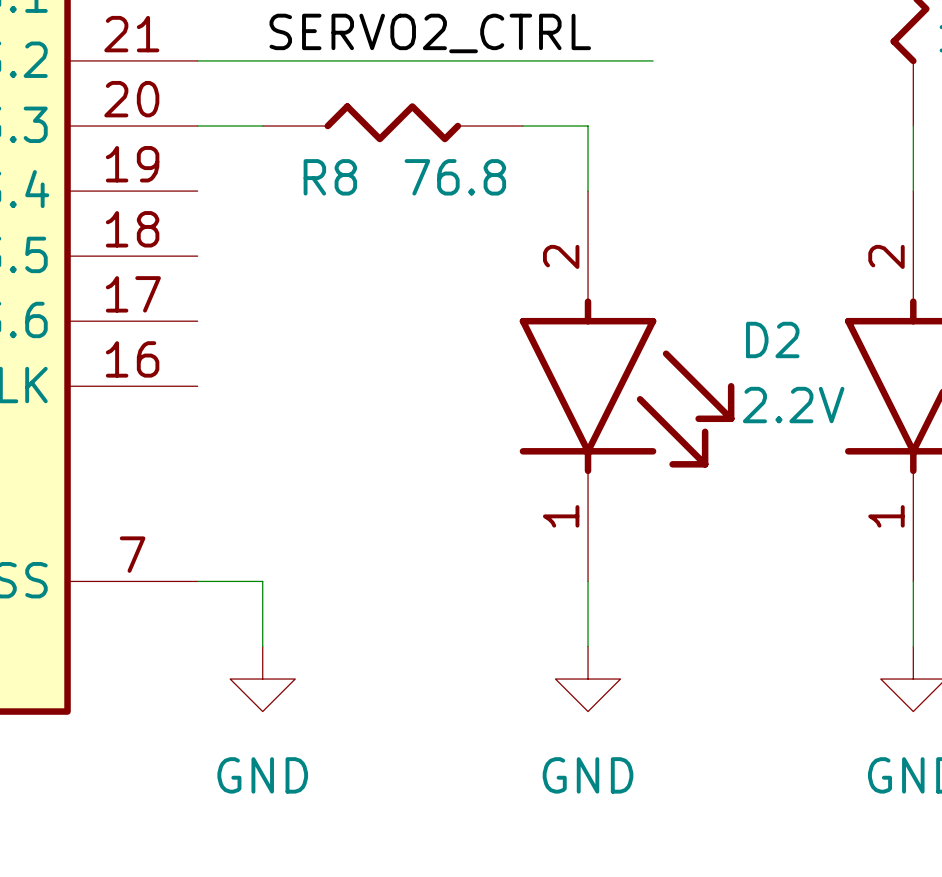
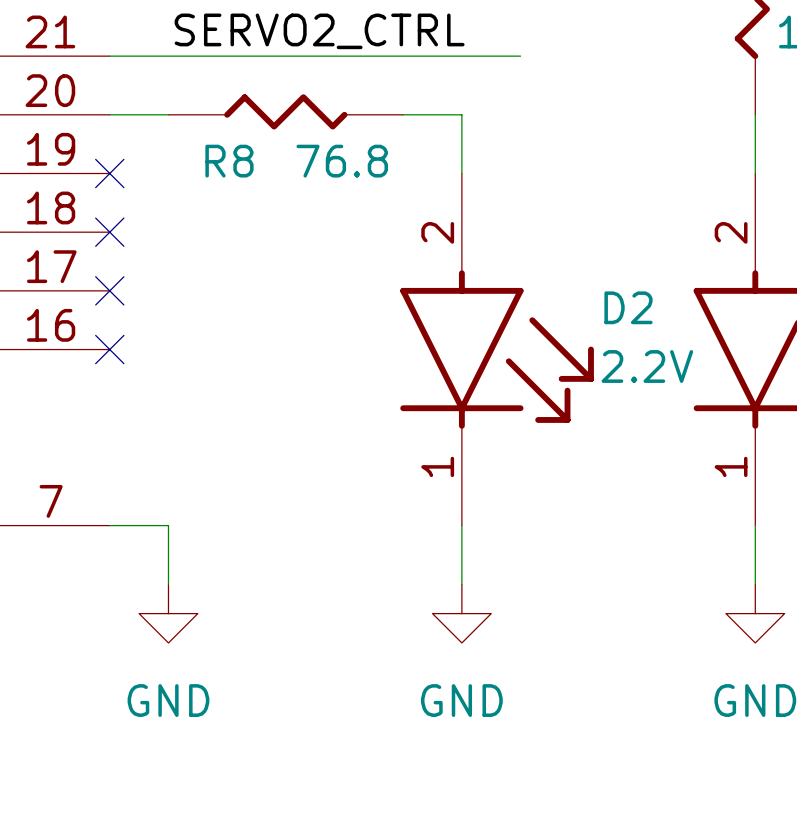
no-connect mark: none -> (109, 173)
no-connect mark: none -> (109, 232)
no-connect mark: none -> (109, 290)
no-connect mark: none -> (109, 349)

